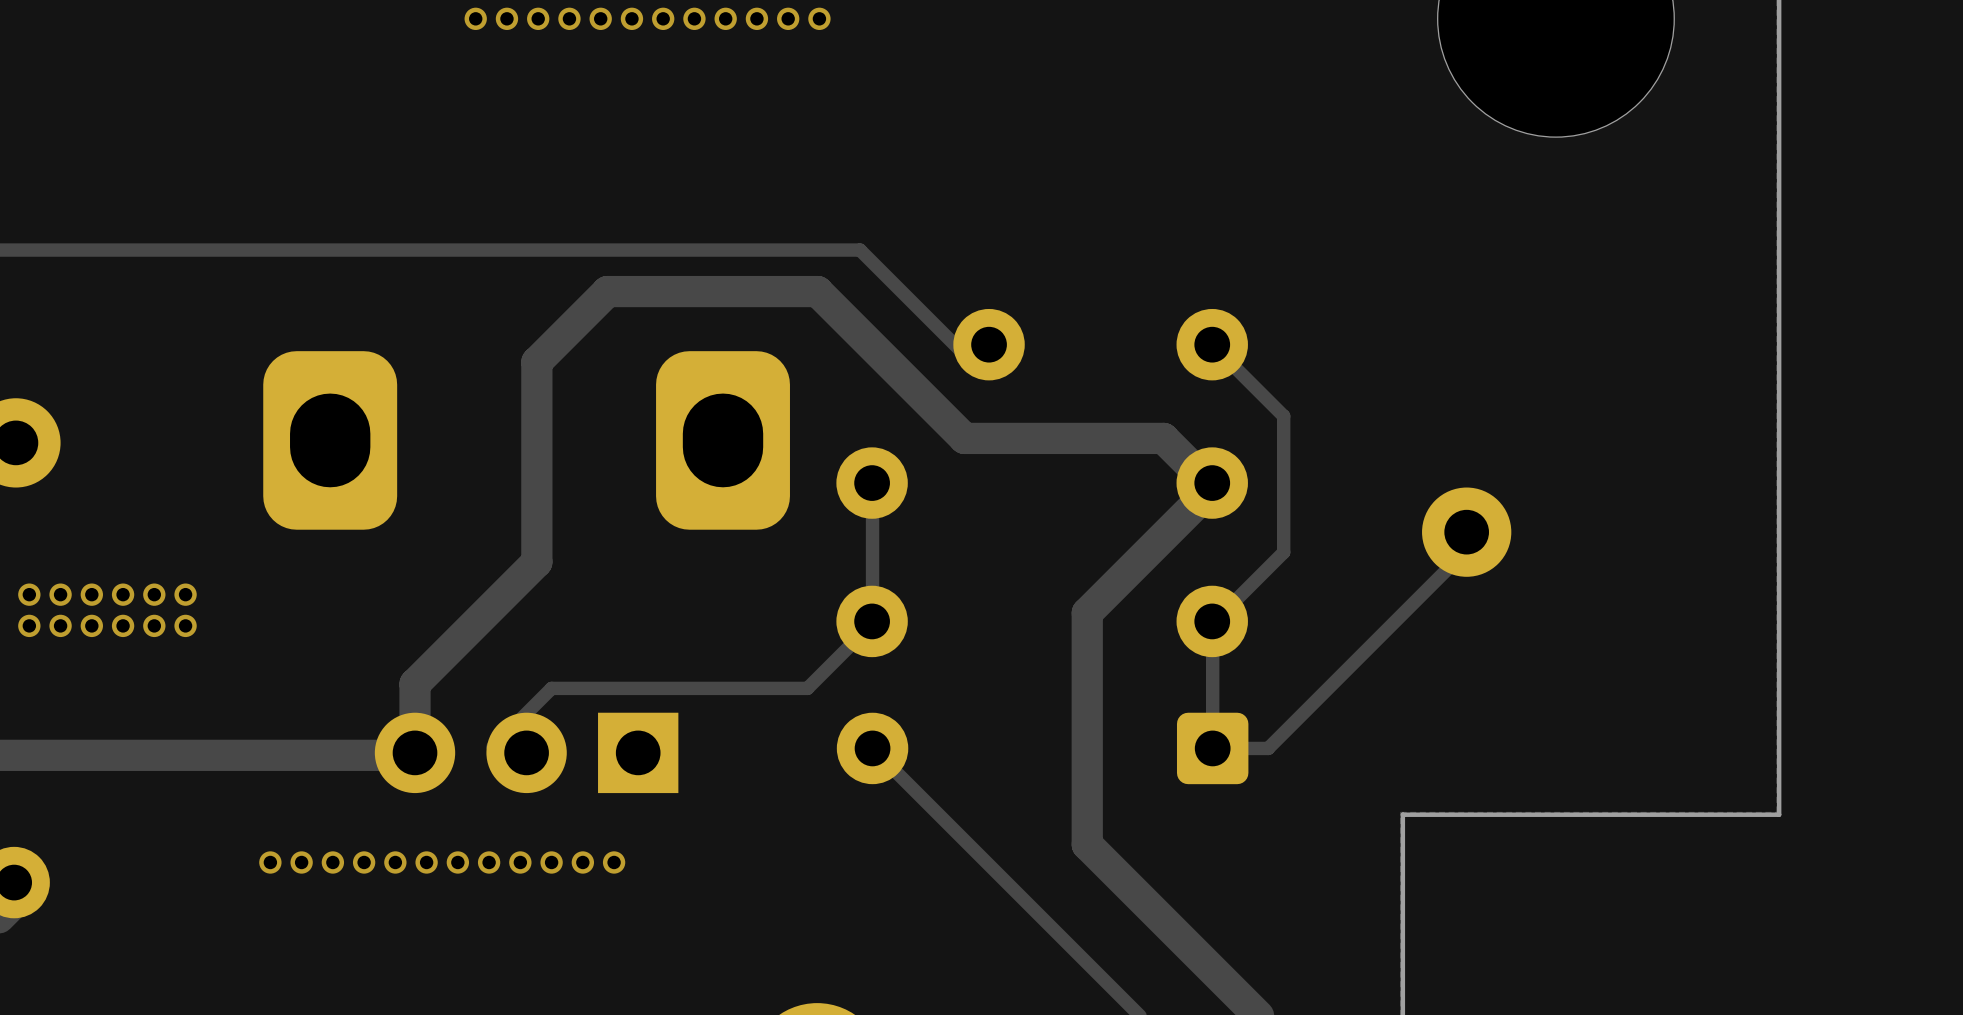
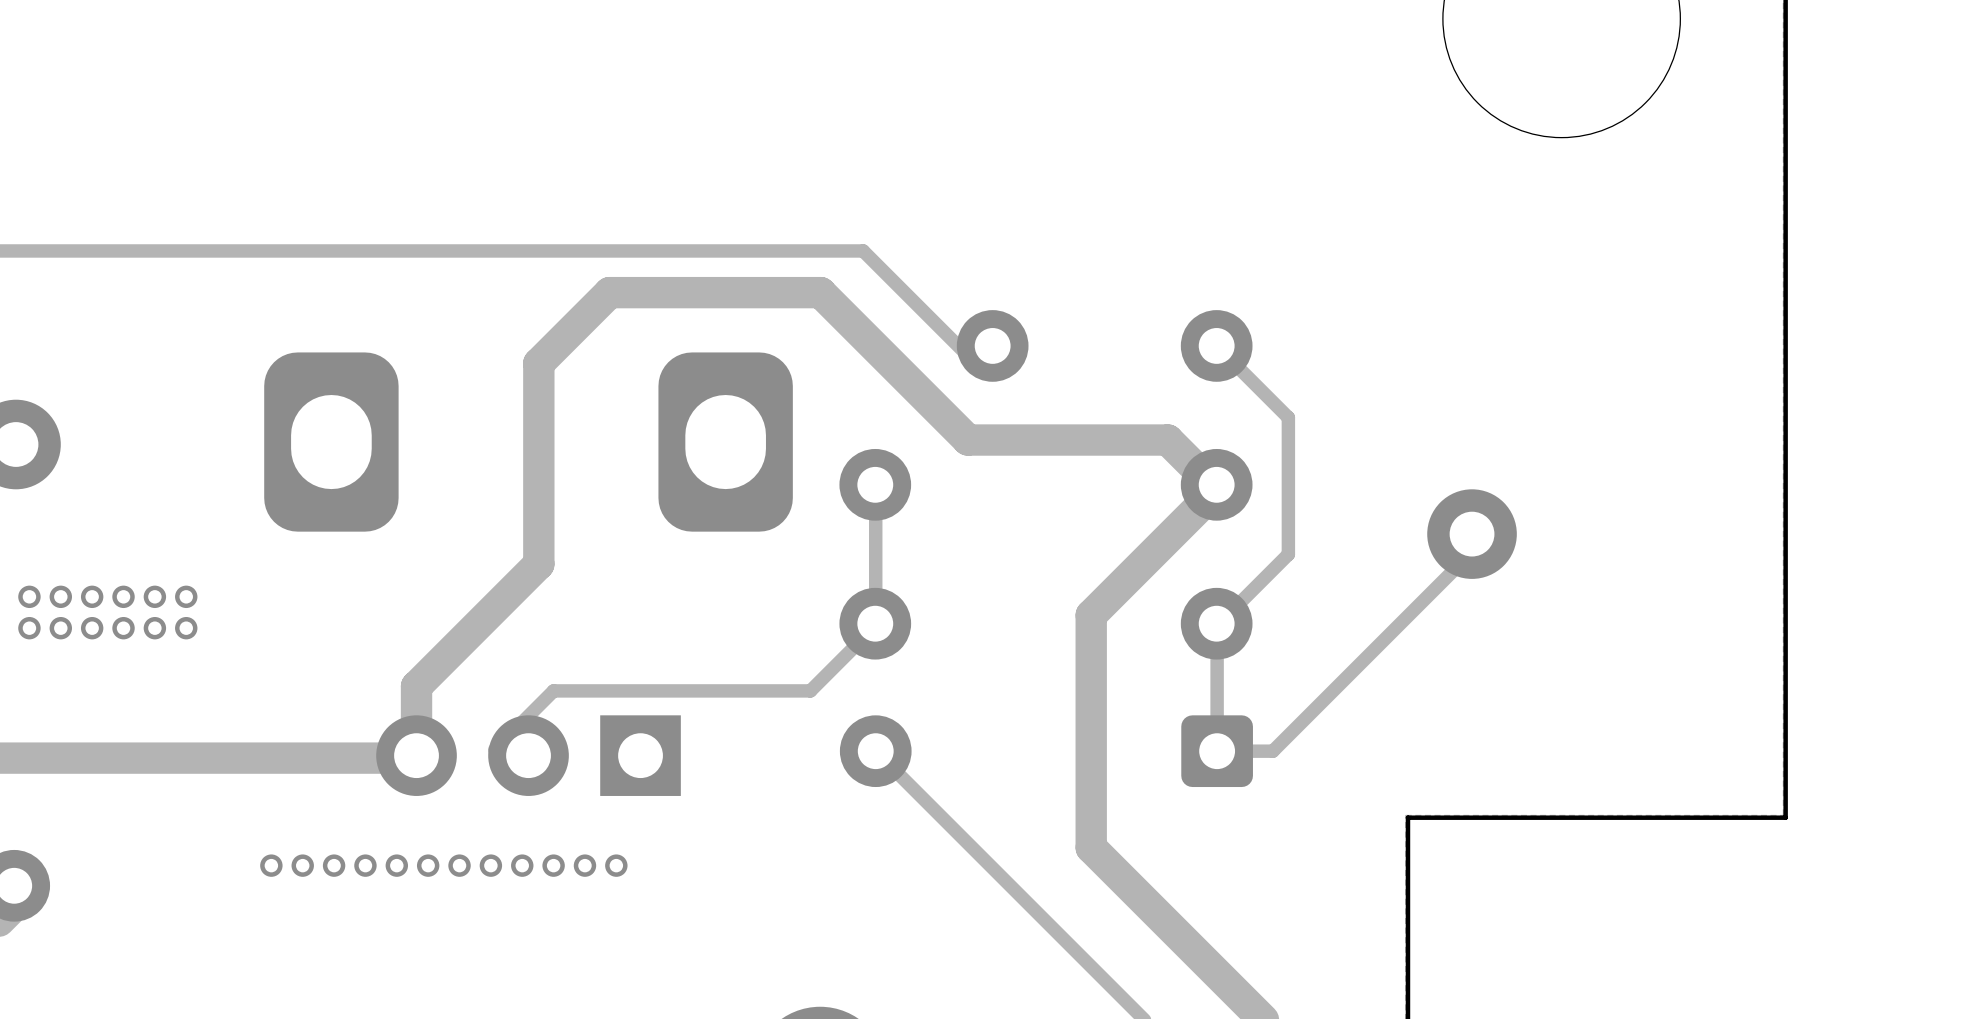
via: (475, 18) -> none
via: (506, 18) -> none
via: (538, 18) -> none
via: (569, 18) -> none
via: (600, 18) -> none
via: (631, 18) -> none
via: (663, 18) -> none
via: (694, 18) -> none
via: (725, 18) -> none
via: (756, 18) -> none
via: (788, 18) -> none
via: (819, 18) -> none

